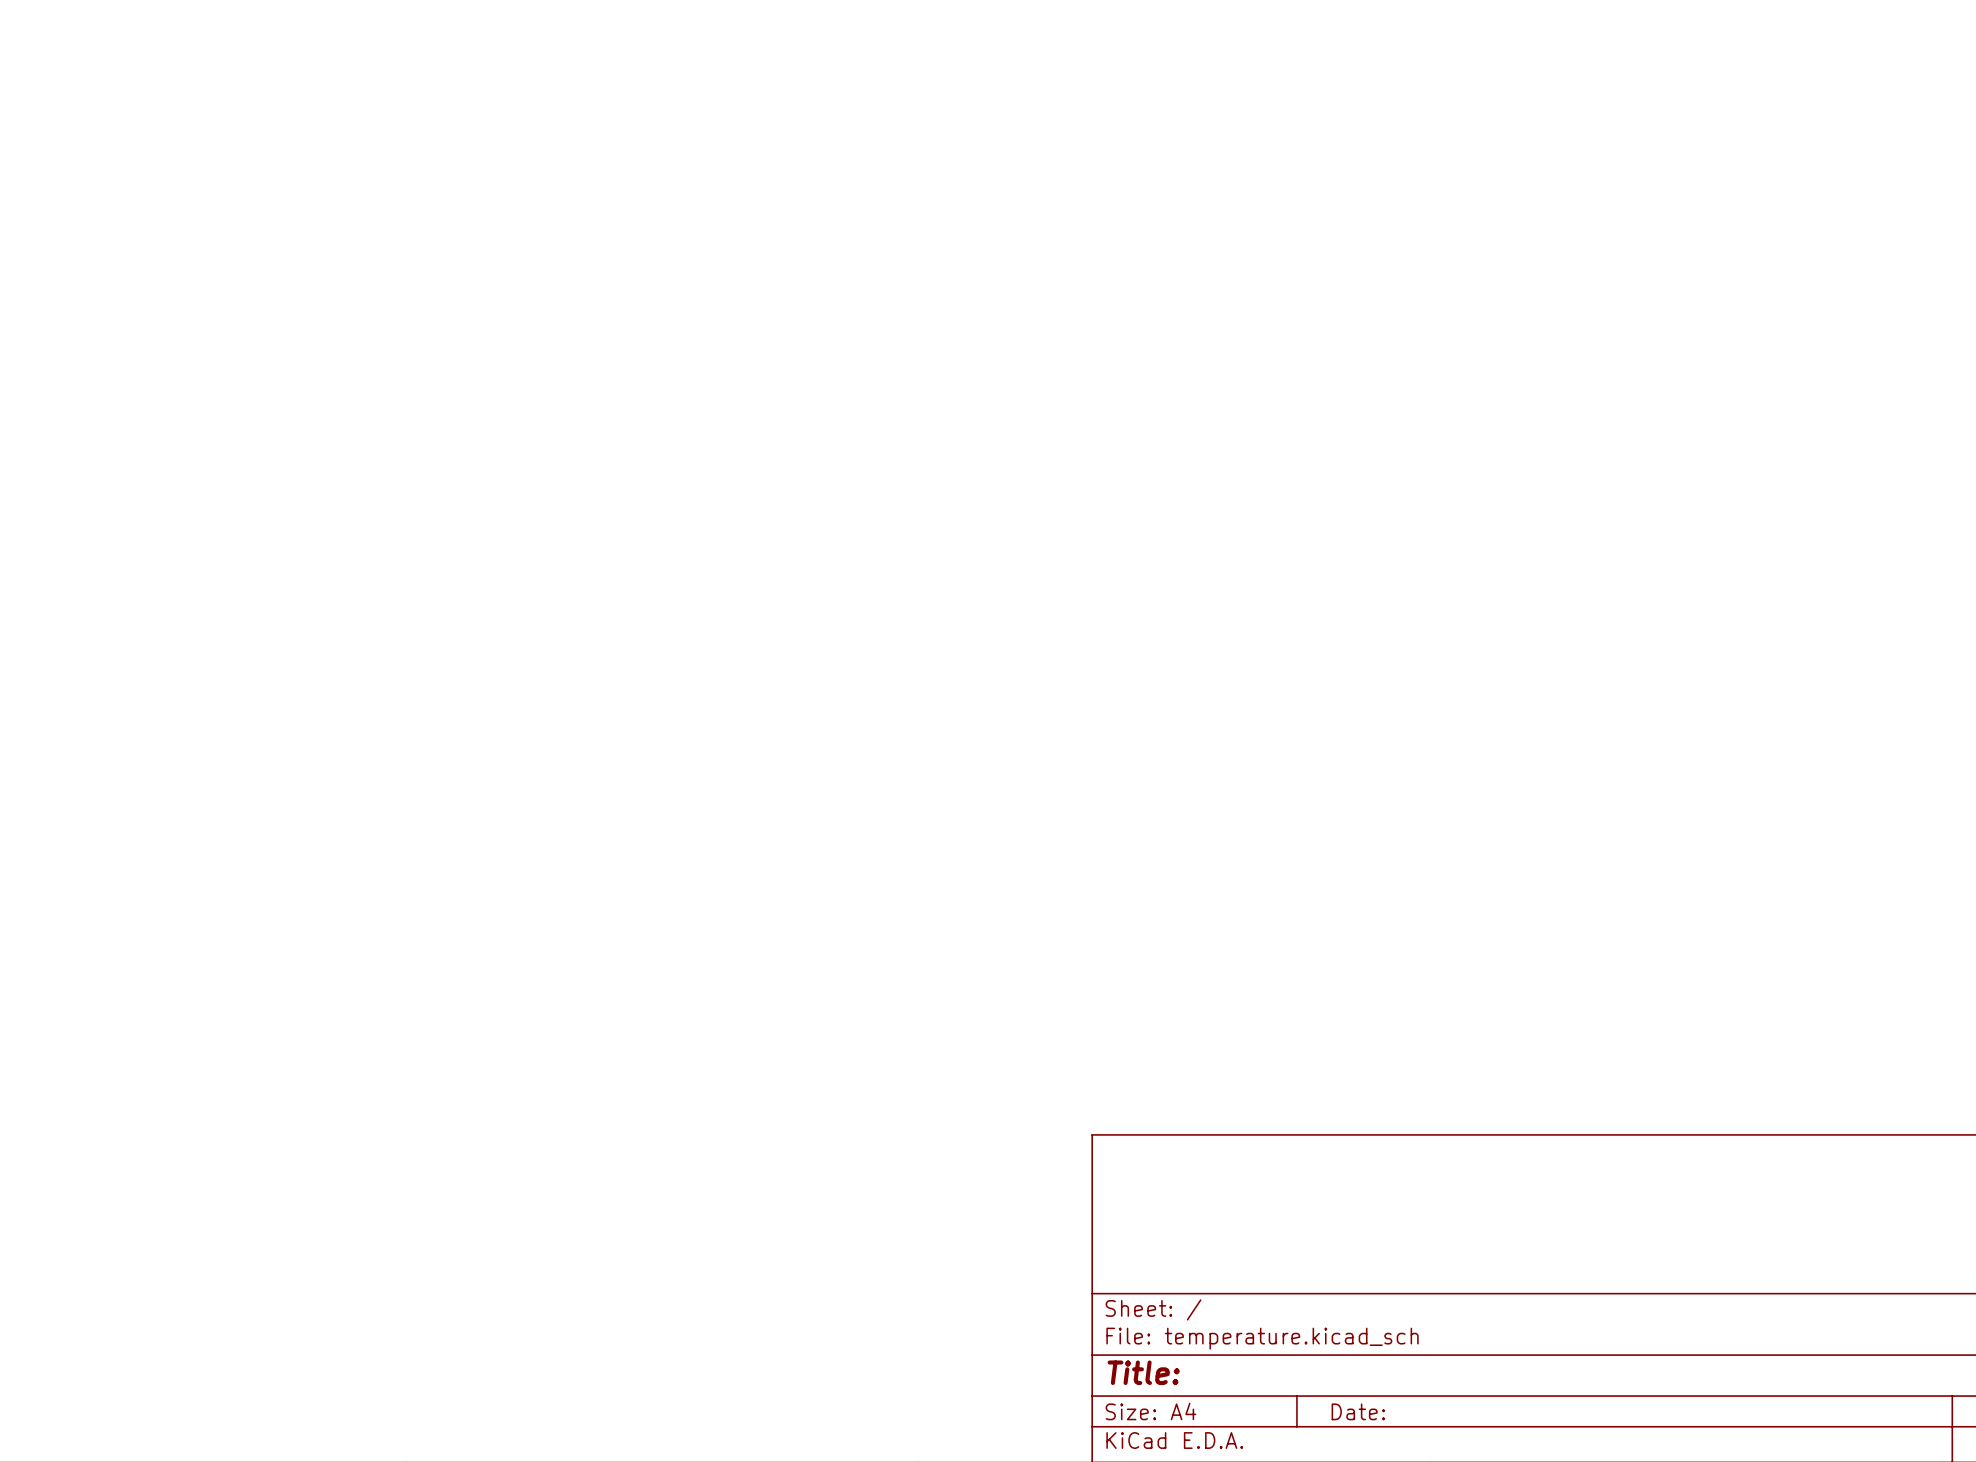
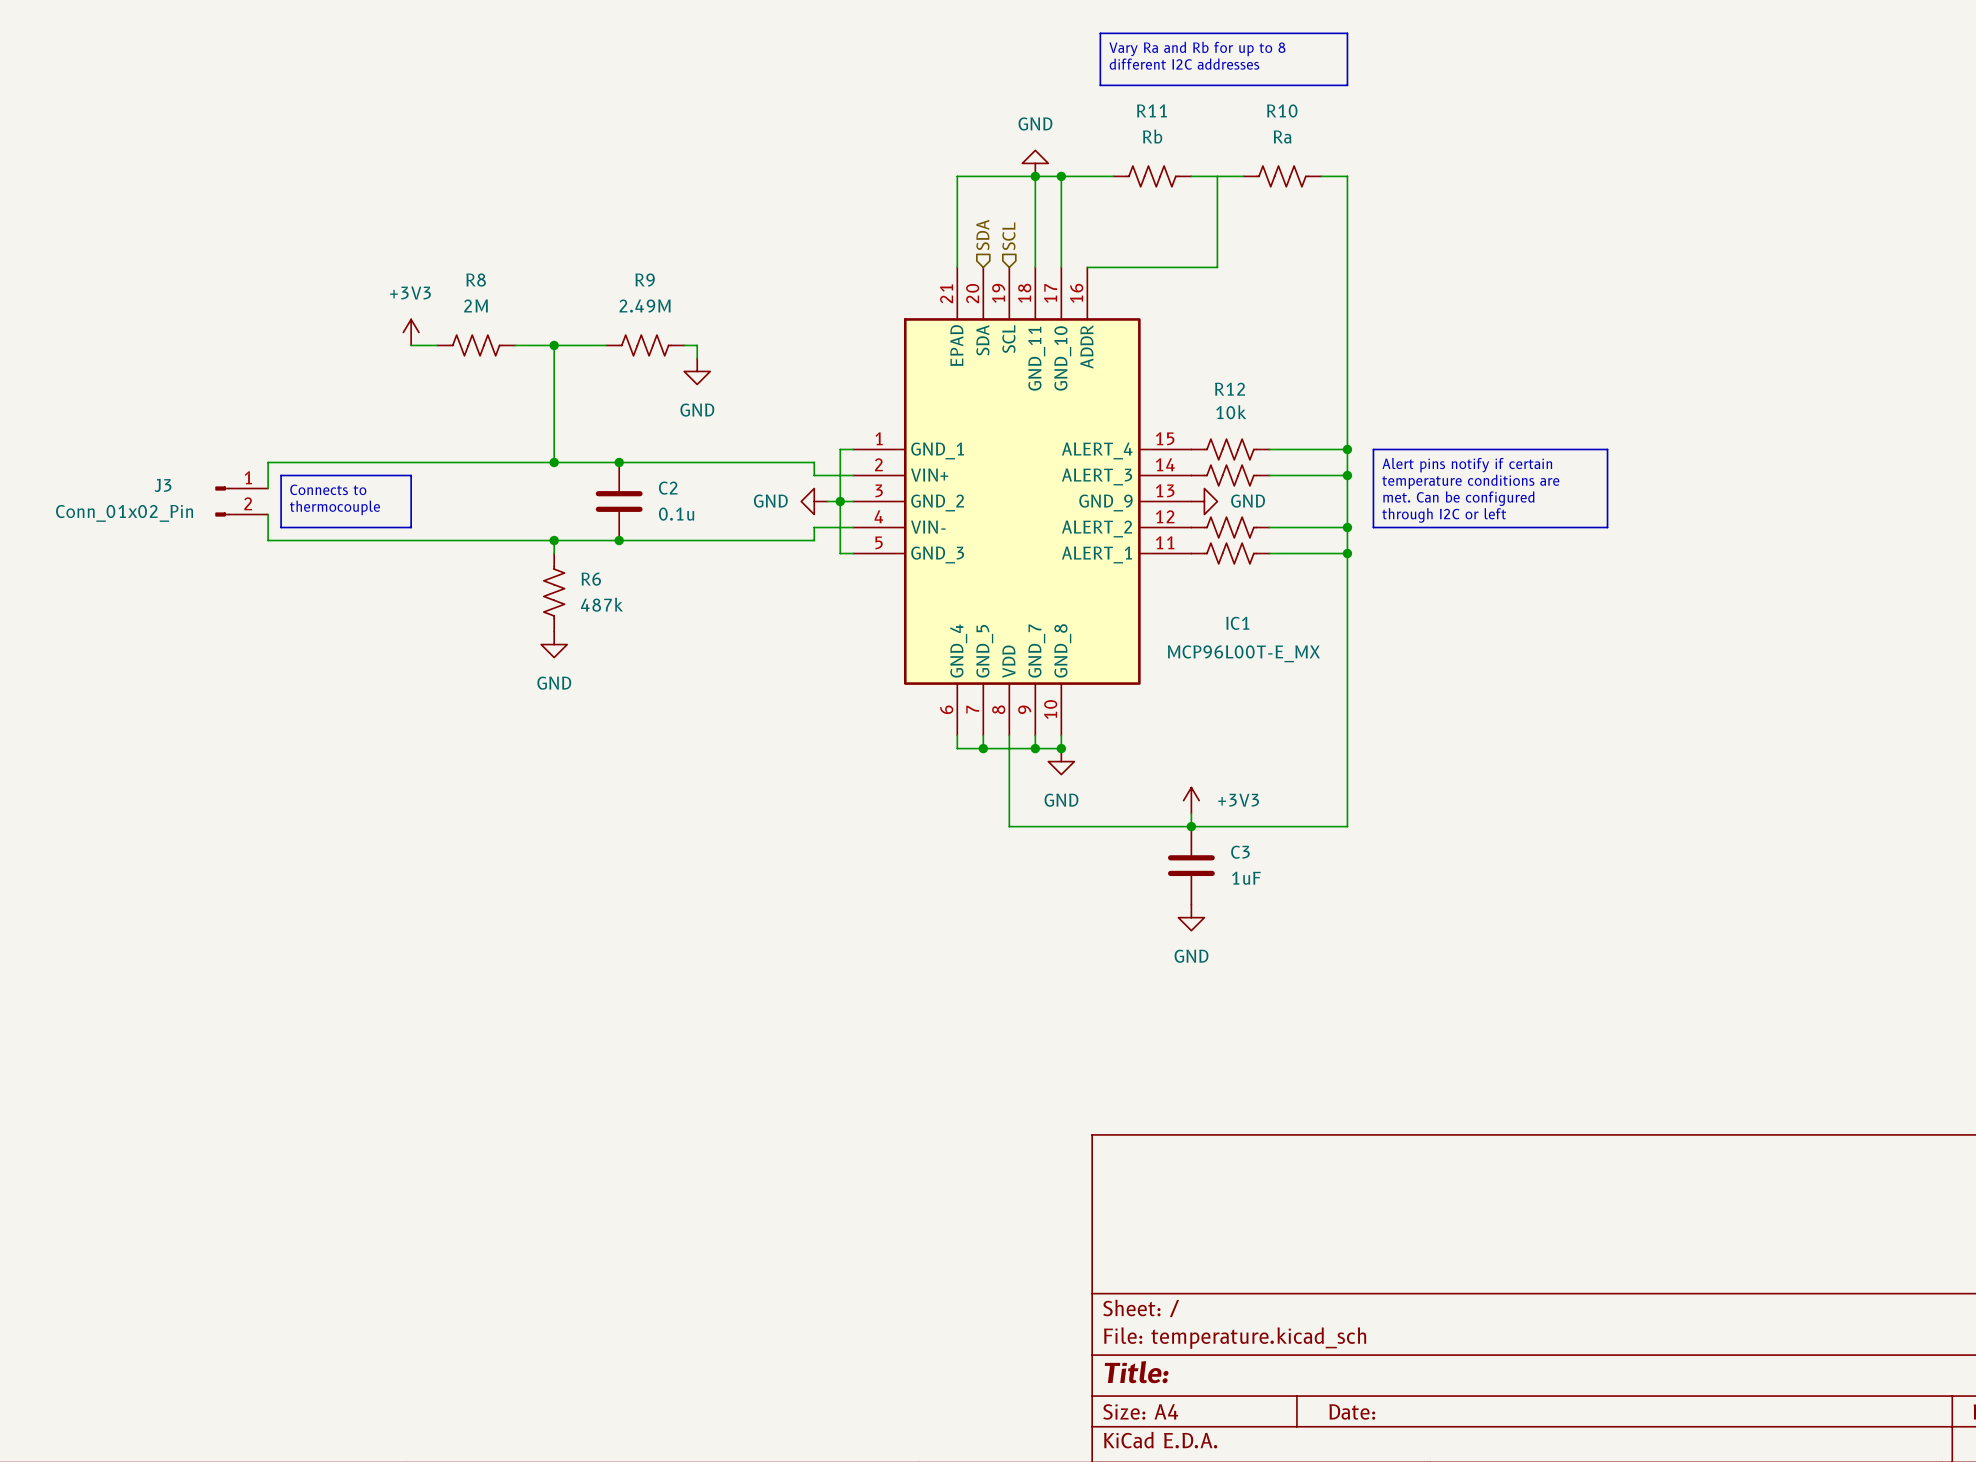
line: none -> (1100, 33) (1347, 33) (1347, 85) (1100, 85) (1100, 33)
text: none -> Vary Ra and Rb for up to 8 (1197, 49)
text: none -> different I2C addresses (1184, 64)
power symbol: none -> GND (1035, 163)
wire: none -> (1035, 176) (1035, 267)
junction: none -> (1035, 176)
wire: none -> (1061, 176) (1061, 267)
junction: none -> (1061, 176)
wire: none -> (1113, 176) (957, 176) (957, 267)
R11: none -> Rb (1152, 176)
wire: none -> (1191, 176) (1243, 176)
wire: none -> (1217, 176) (1217, 267) (1087, 267)
R10: none -> Ra (1282, 176)
wire: none -> (1321, 176) (1347, 176) (1347, 826) (1009, 826) (1009, 735)
hierarchical label: none -> SDA (982, 235)
hierarchical label: none -> SCL (1008, 236)
power symbol: none -> +3V3 (411, 332)
wire: none -> (411, 345) (437, 345)
R8: none -> 2M (476, 345)
wire: none -> (515, 345) (606, 345)
wire: none -> (554, 345) (554, 462)
junction: none -> (554, 345)
R9: none -> 2.49M (645, 345)
wire: none -> (684, 345) (697, 345) (697, 358)
power symbol: none -> GND (697, 371)
wire: none -> (853, 449) (840, 449) (840, 553) (853, 553)
R12: none -> 10k (1230, 449)
wire: none -> (1269, 449) (1347, 449)
junction: none -> (1347, 449)
line: none -> (1373, 449) (1607, 449) (1607, 527) (1373, 527) (1373, 449)
junction: none -> (554, 462)
junction: none -> (619, 462)
text: none -> Alert pins notify if certain (1467, 465)
line: none -> (281, 475) (411, 475) (411, 527) (281, 527) (281, 475)
wire: none -> (853, 475) (814, 475) (814, 462) (268, 462) (268, 488)
part: none -> (1230, 475)
wire: none -> (1269, 475) (1347, 475)
junction: none -> (1347, 475)
text: none -> temperature conditions are (1470, 481)
text: none -> Connects to (328, 489)
text: none -> met. Can be configured (1458, 498)
J3: none -> Conn_01x02_Pin (241, 501)
C2: none -> 0.1u (619, 501)
power symbol: none -> GND (814, 501)
wire: none -> (827, 501) (853, 501)
junction: none -> (840, 501)
IC1: none -> MCP96L00T-E_MX (1022, 501)
power symbol: none -> GND (1204, 501)
text: none -> thermocouple (334, 507)
wire: none -> (268, 514) (268, 540) (814, 540) (814, 527) (853, 527)
text: none -> through I2C or left (1444, 515)
part: none -> (1230, 527)
wire: none -> (1269, 527) (1347, 527)
junction: none -> (1347, 527)
wire: none -> (554, 540) (554, 553)
junction: none -> (554, 540)
junction: none -> (619, 540)
part: none -> (1230, 553)
wire: none -> (1269, 553) (1347, 553)
junction: none -> (1347, 553)
R6: none -> 487k (554, 592)
power symbol: none -> GND (554, 644)
wire: none -> (957, 735) (957, 748) (1061, 748) (1061, 735)
wire: none -> (983, 735) (983, 748)
wire: none -> (1035, 735) (1035, 748)
junction: none -> (983, 748)
junction: none -> (1035, 748)
junction: none -> (1061, 748)
power symbol: none -> GND (1061, 761)
power symbol: none -> +3V3 (1191, 800)
wire: none -> (1191, 813) (1191, 826)
junction: none -> (1191, 826)
C3: none -> 1uF (1191, 865)
power symbol: none -> GND (1191, 917)

